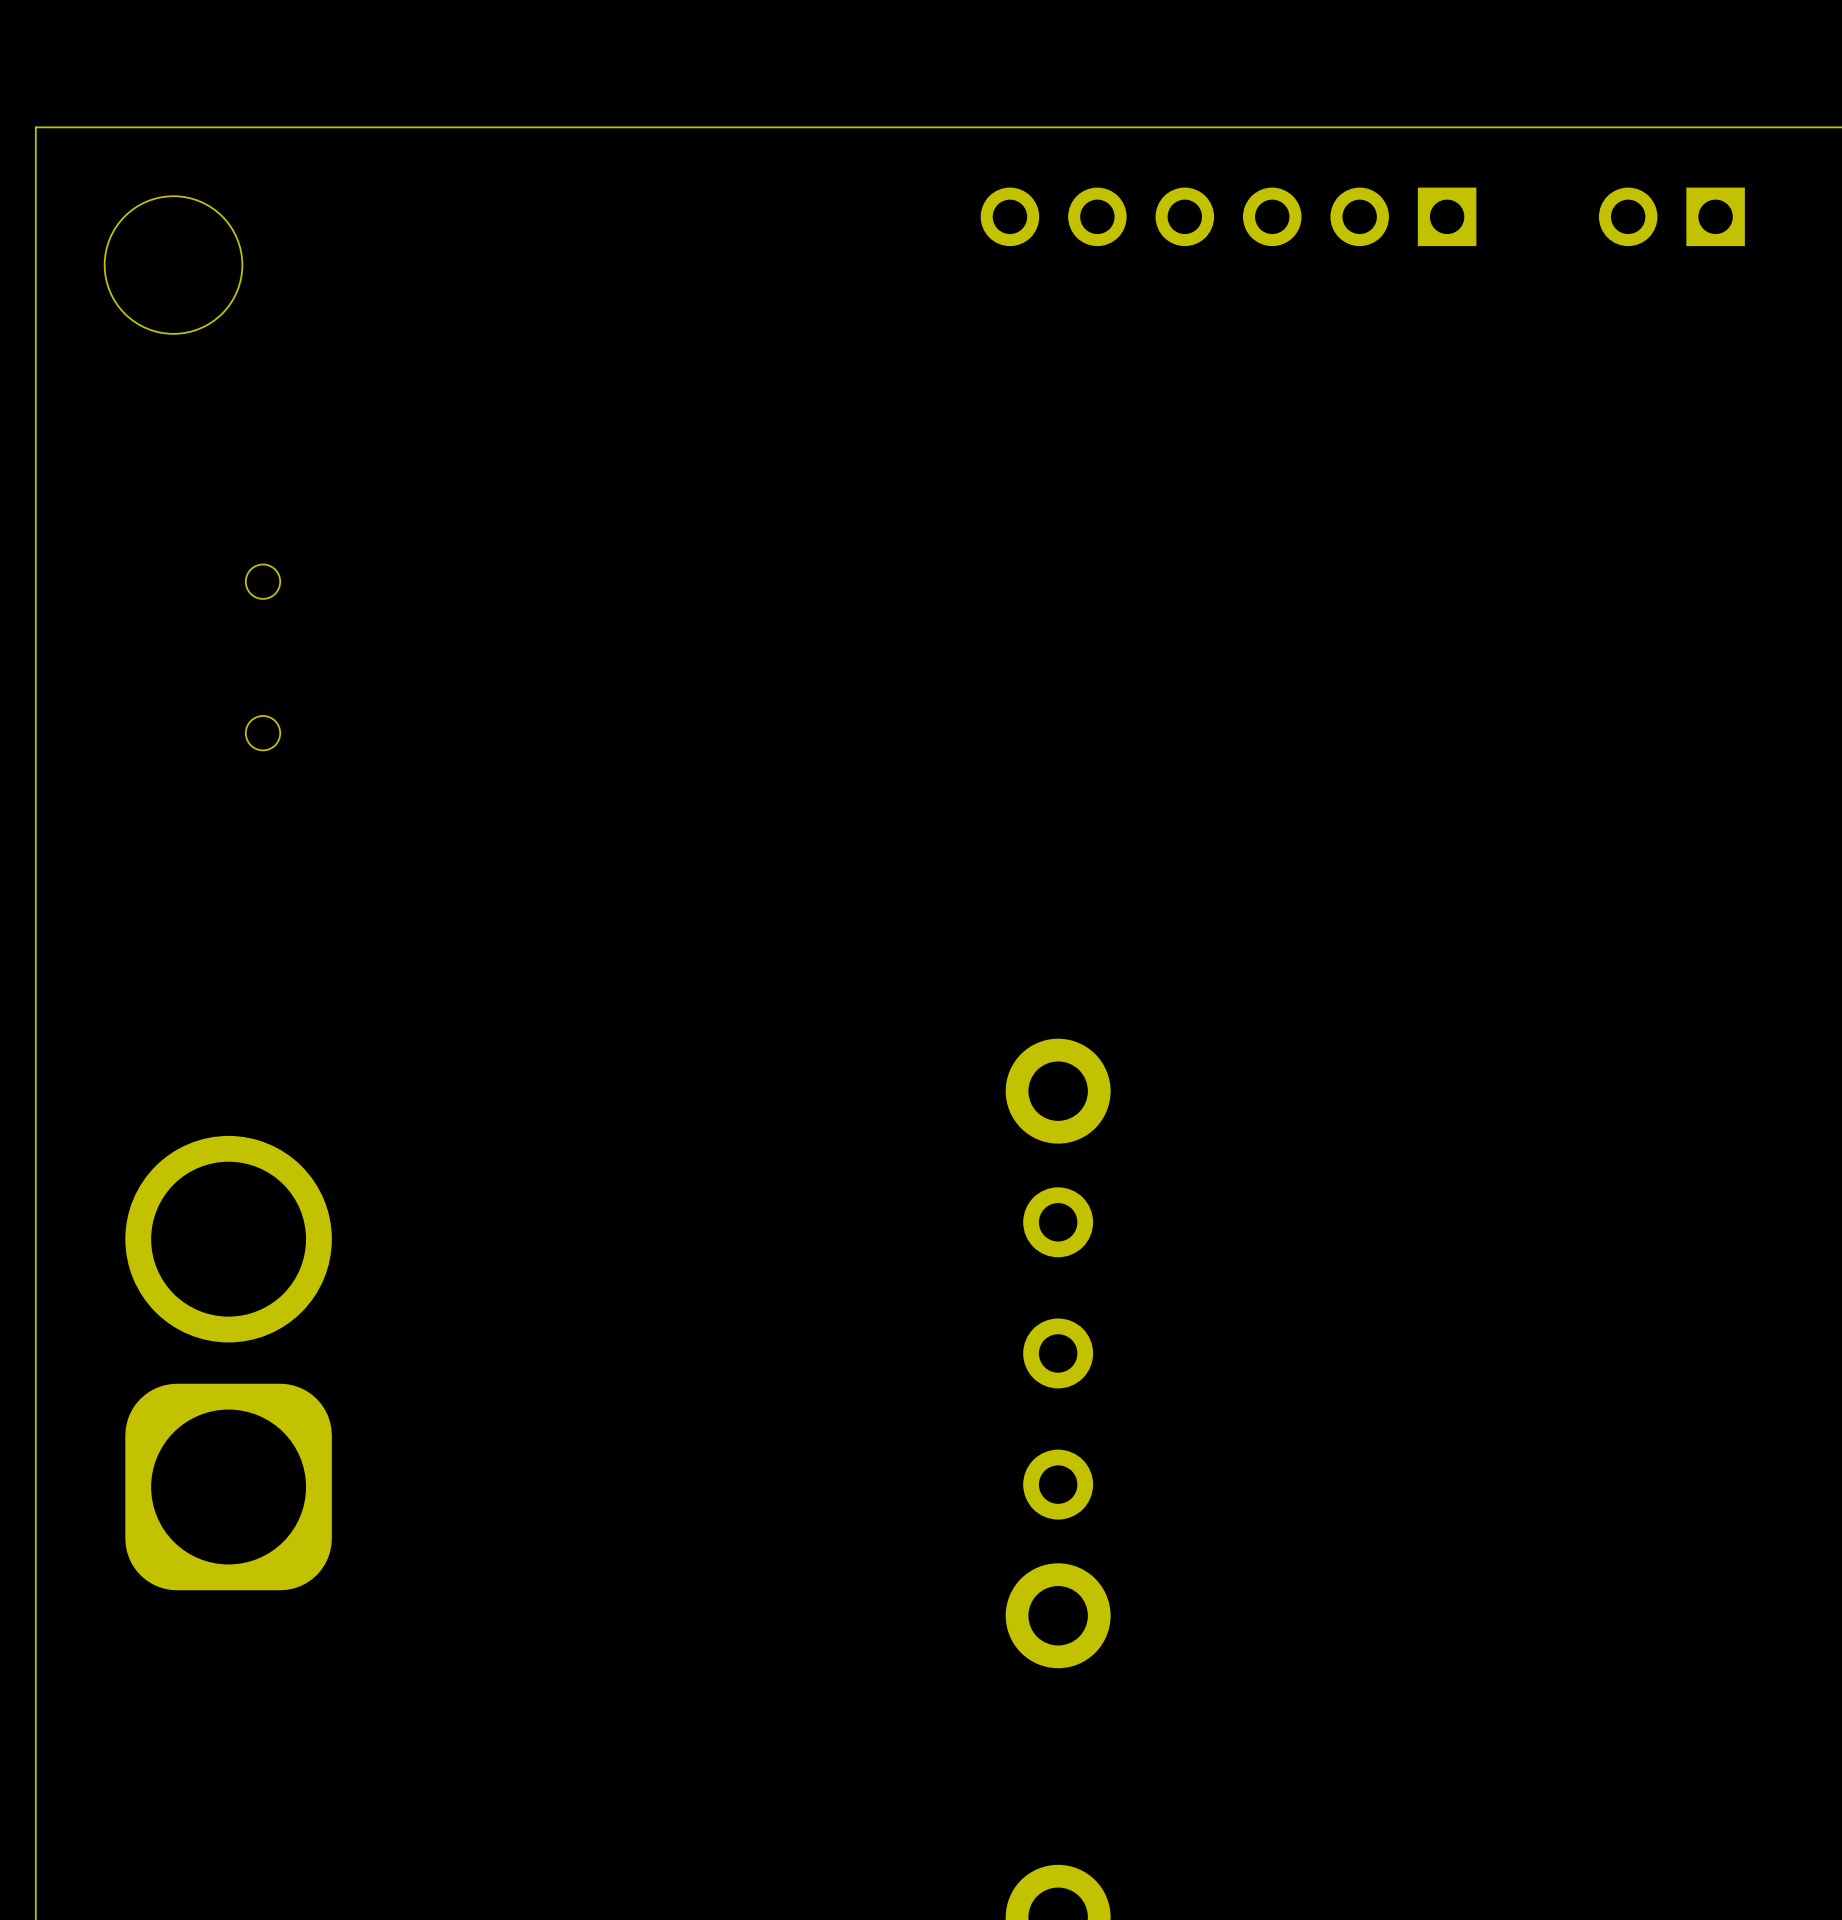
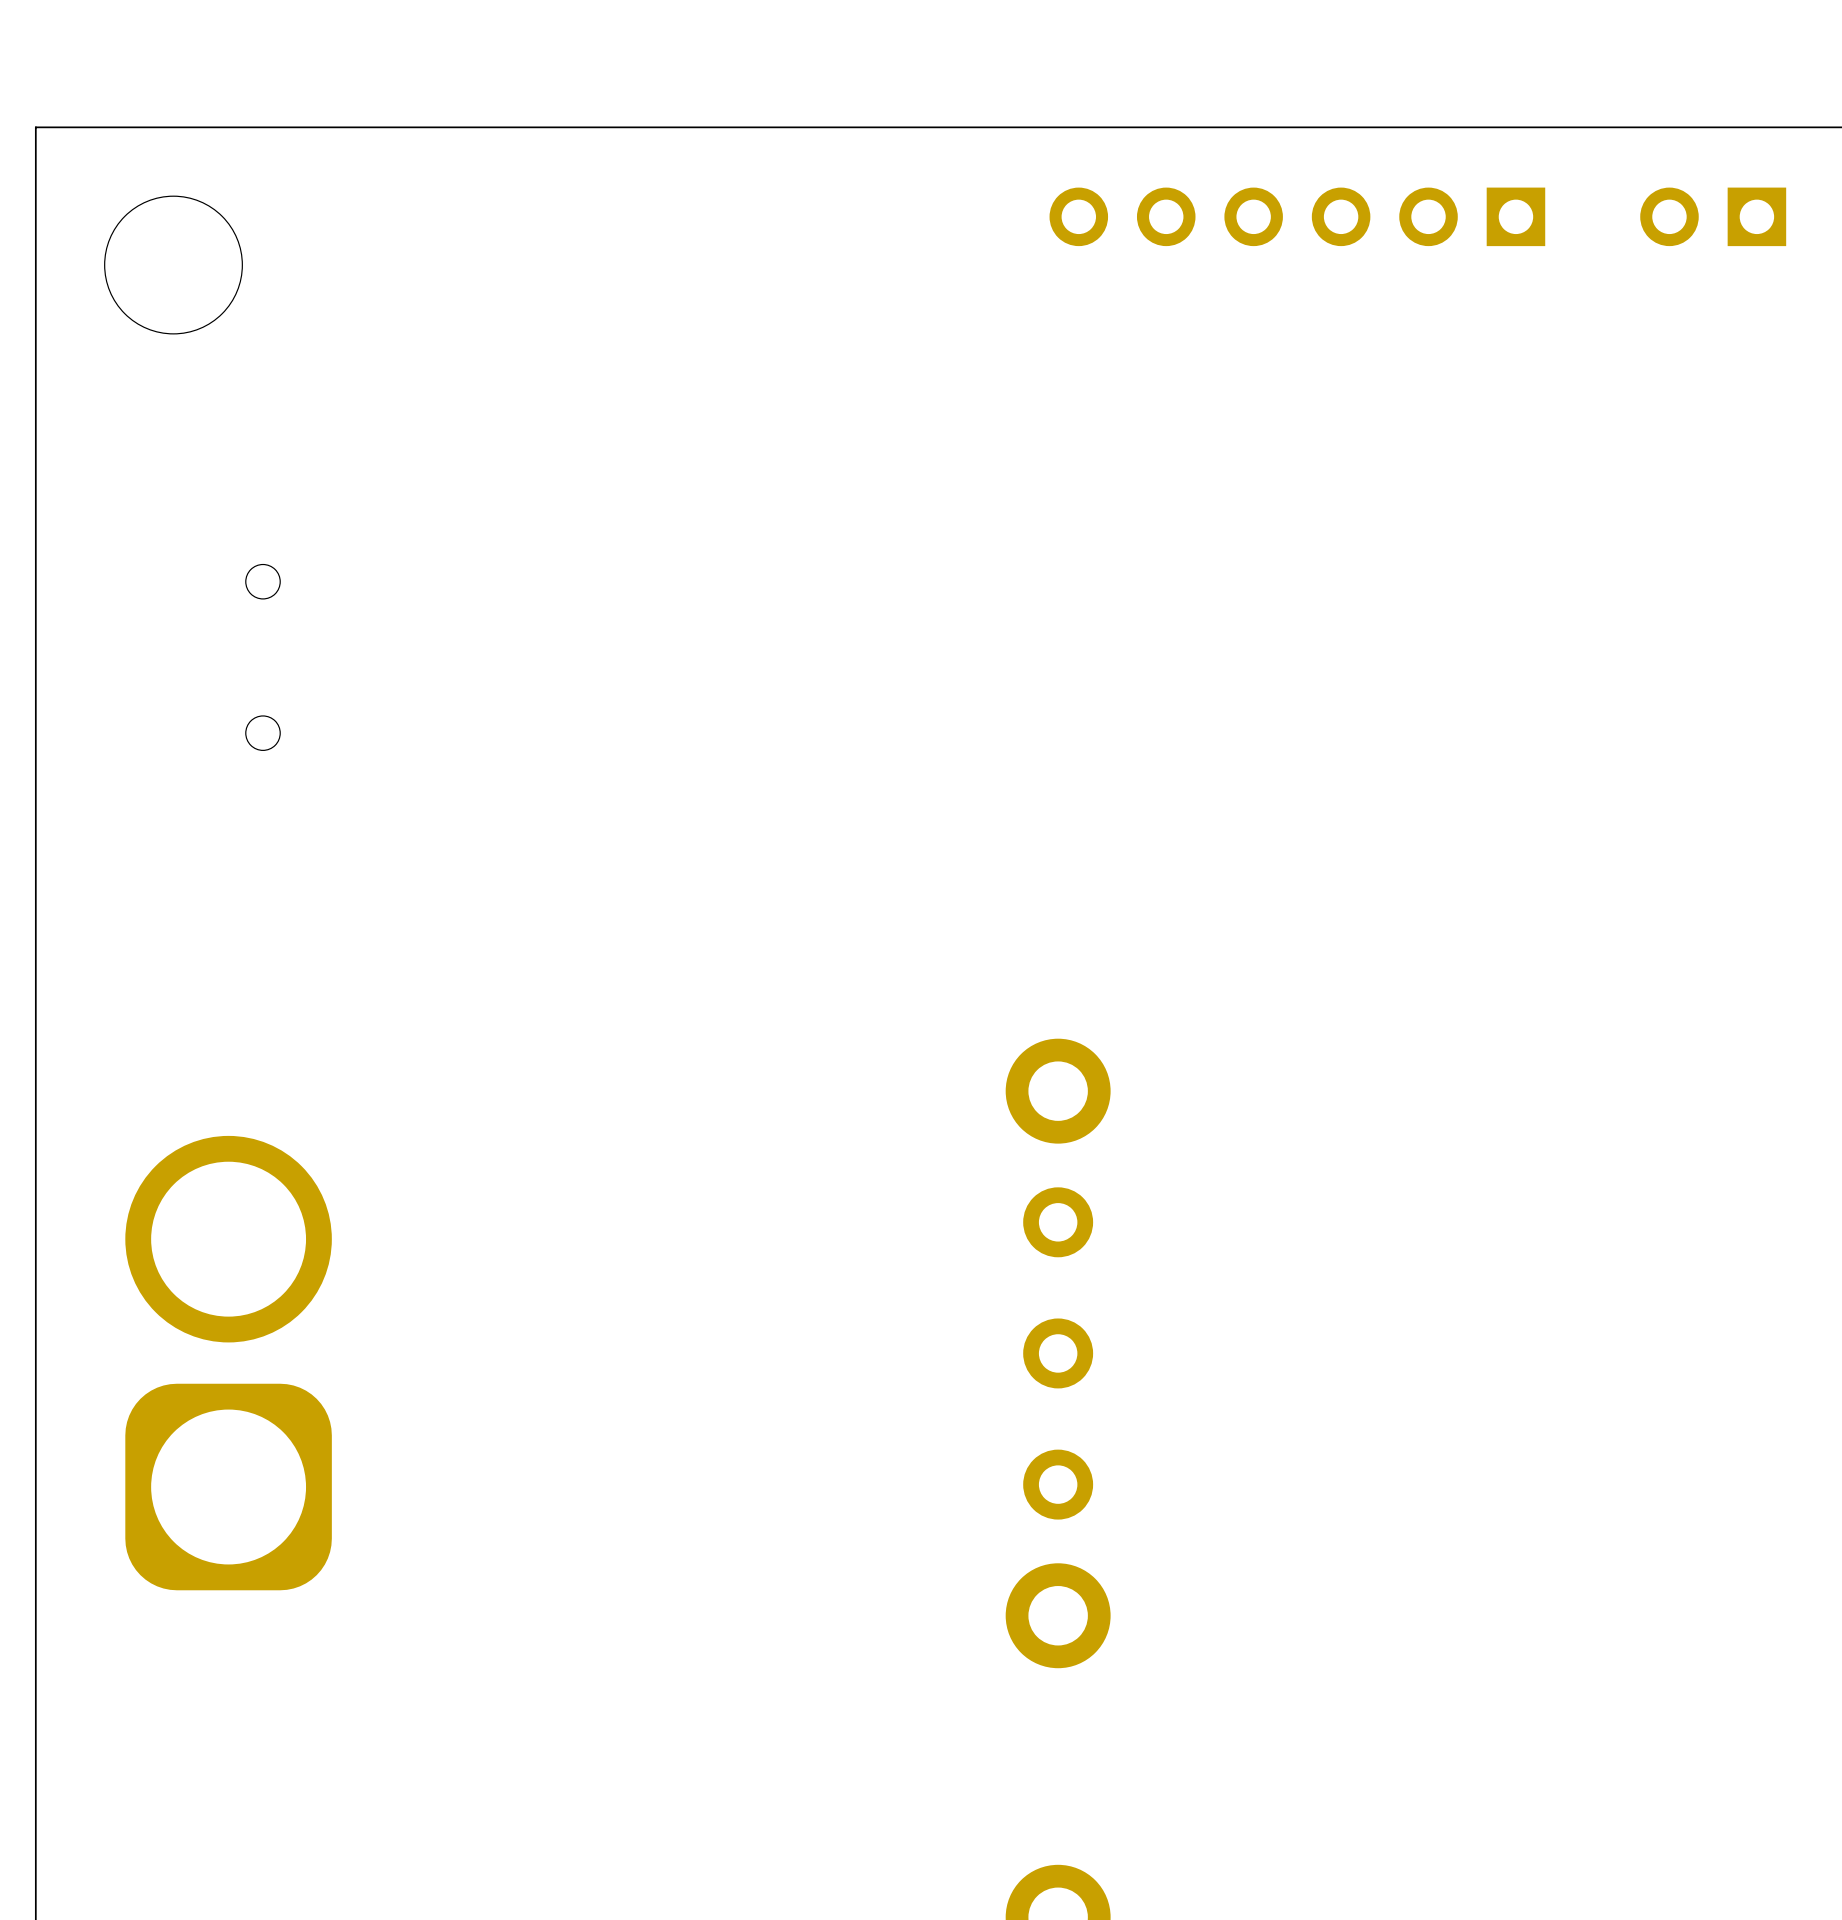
part position: (1228, 216) -> (1297, 216)
part position: (1671, 216) -> (1713, 216)

